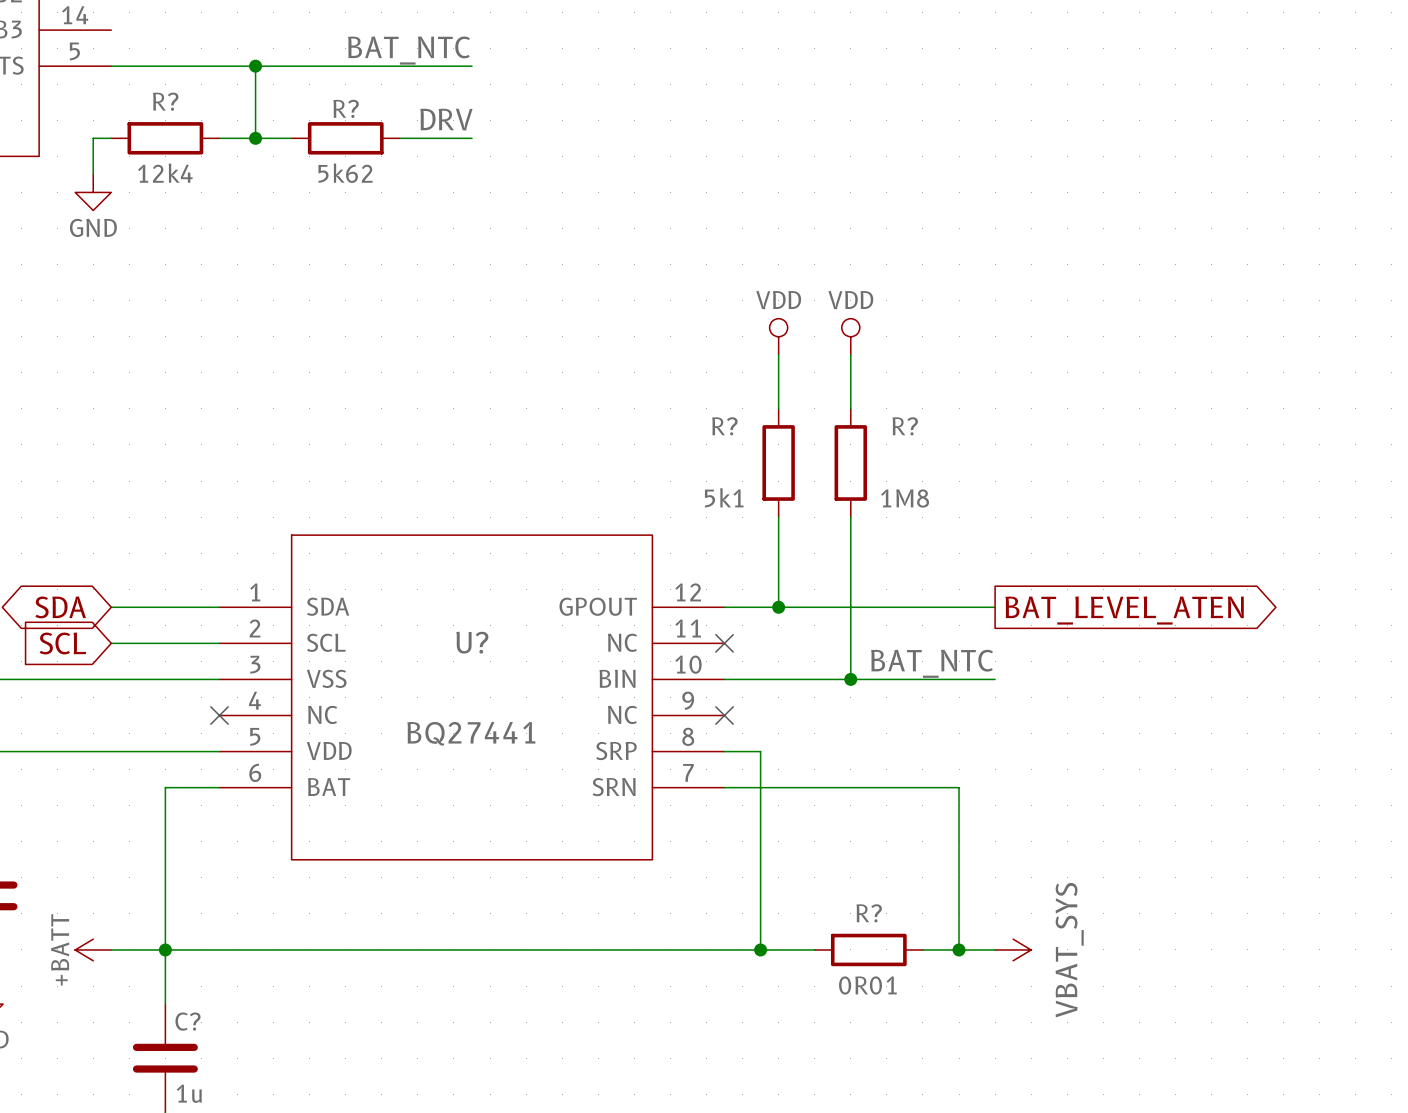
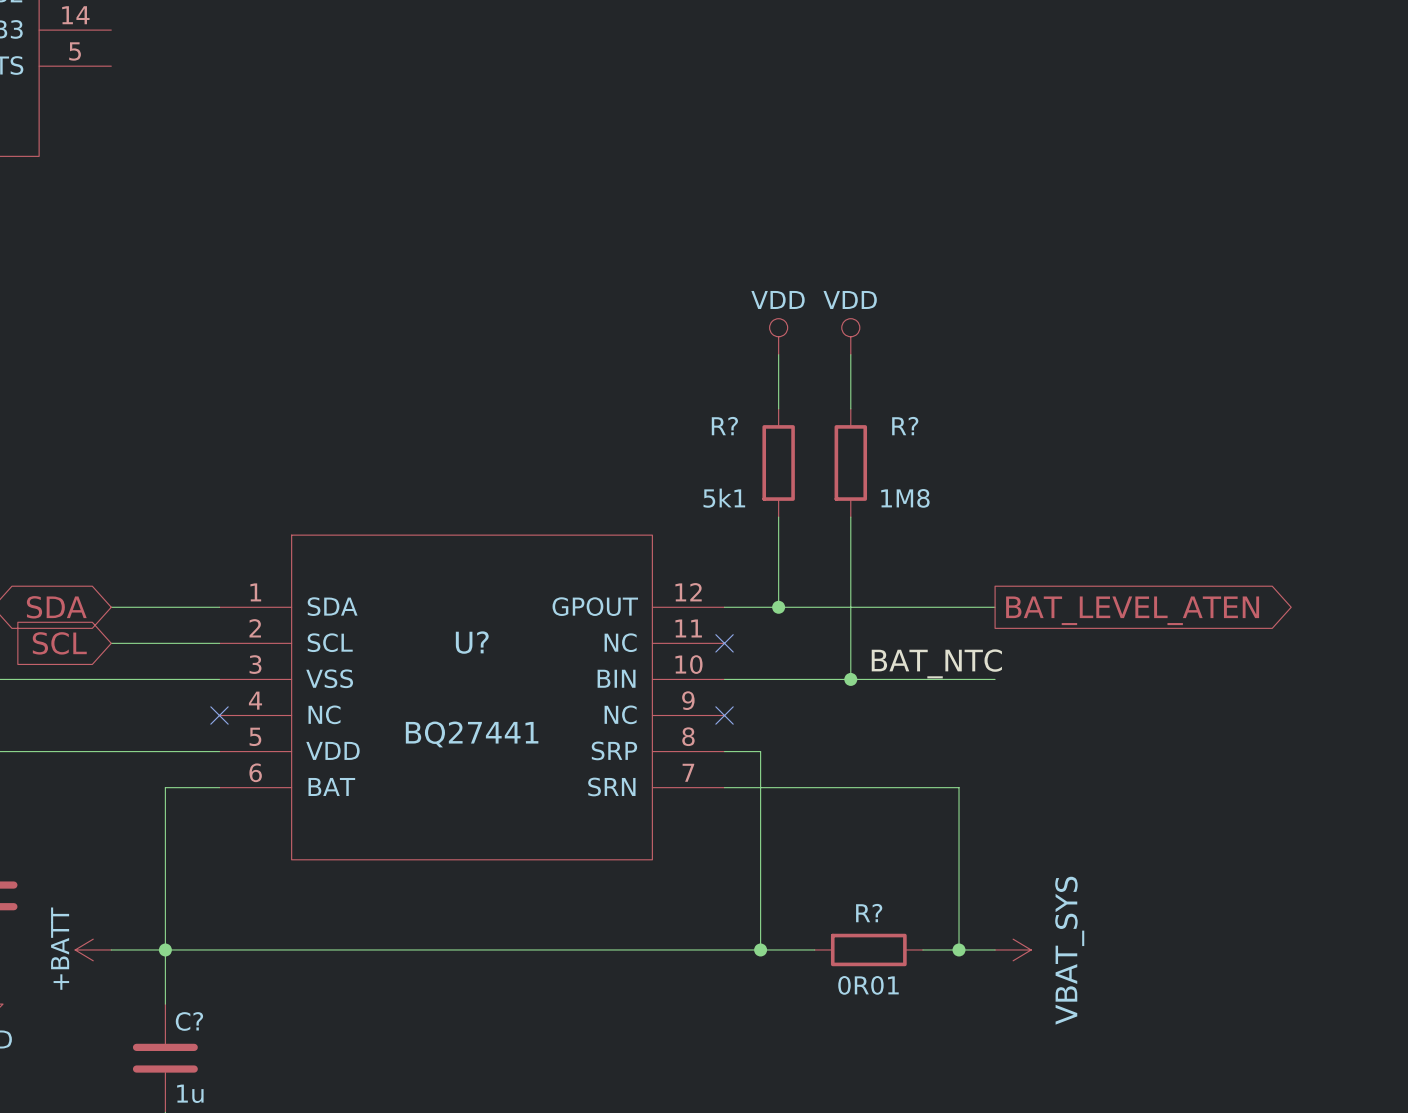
label: BAT_NTC (409, 50) -> none
wire: (111, 66) (472, 66) -> none
wire: (255, 66) (255, 138) -> none
junction: (255, 66) -> none
label: DRV (446, 119) -> none
wire: (111, 138) (93, 138) (93, 174) -> none
R?: 12k4 (165, 138) -> none
wire: (219, 138) (291, 138) -> none
junction: (255, 138) -> none
R?: 5k62 (345, 138) -> none
wire: (399, 138) (472, 138) -> none
power symbol: GND (93, 192) -> none

